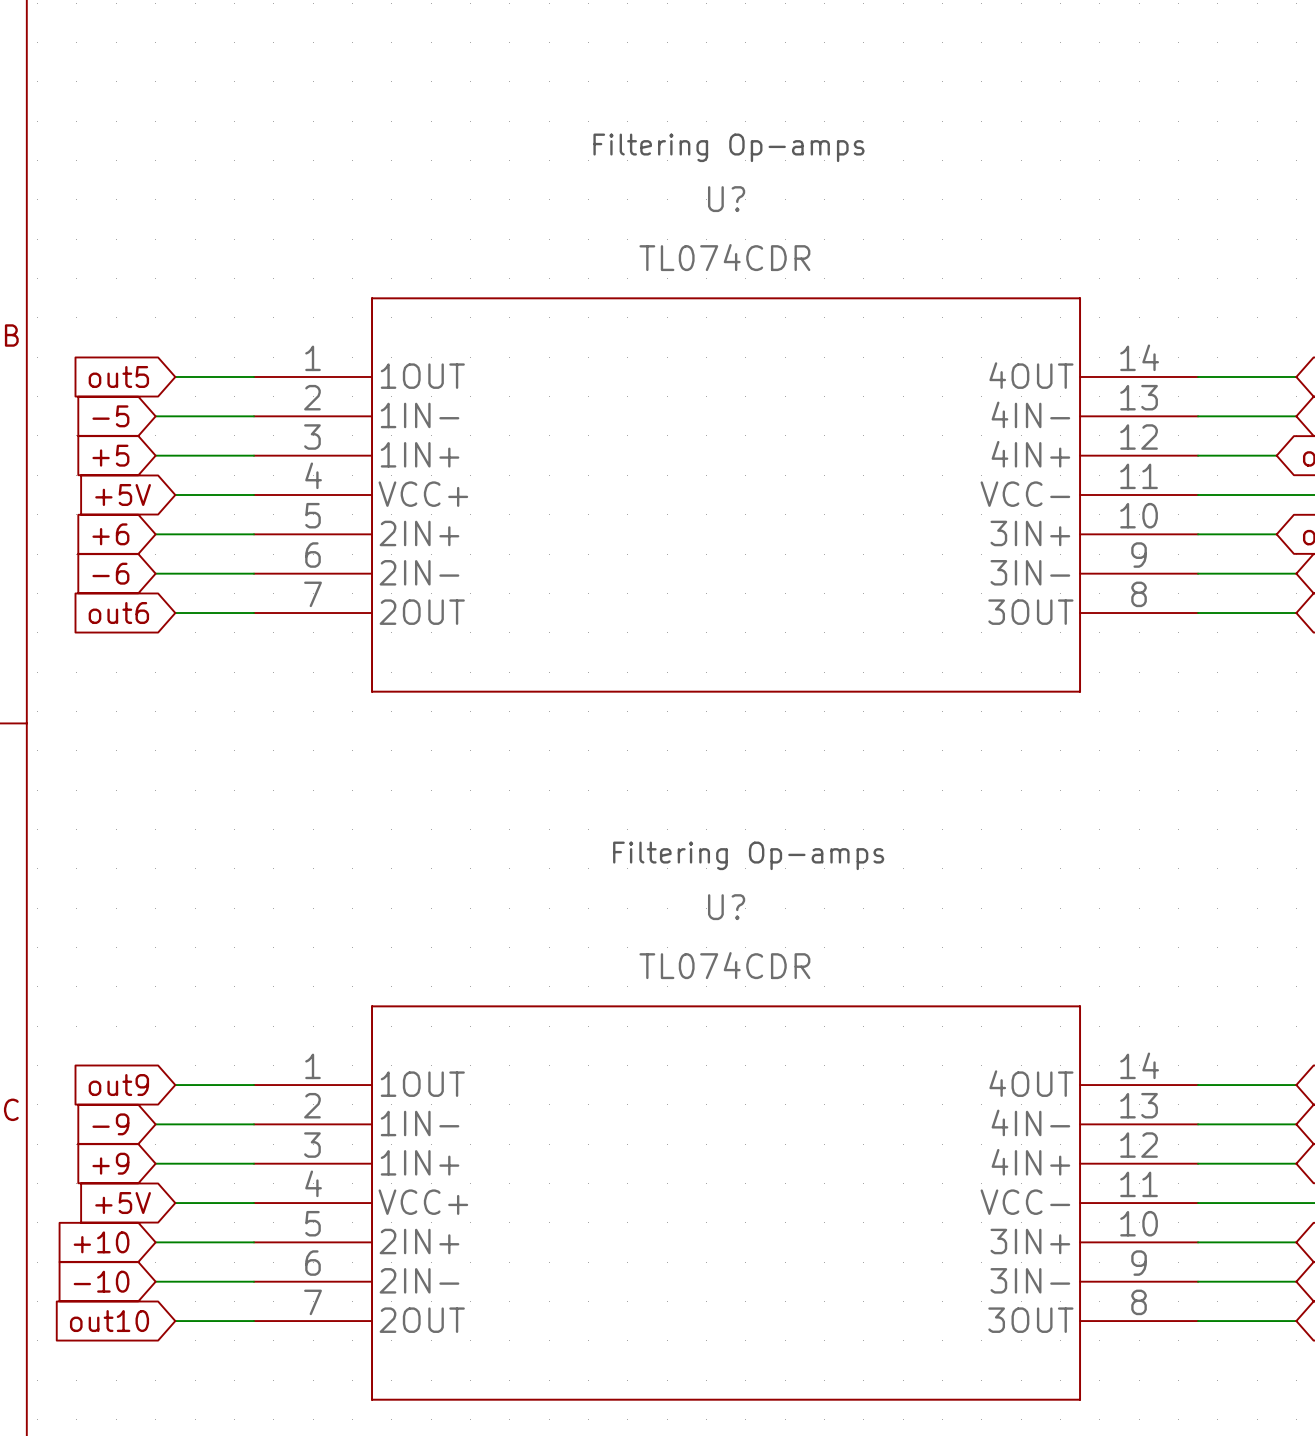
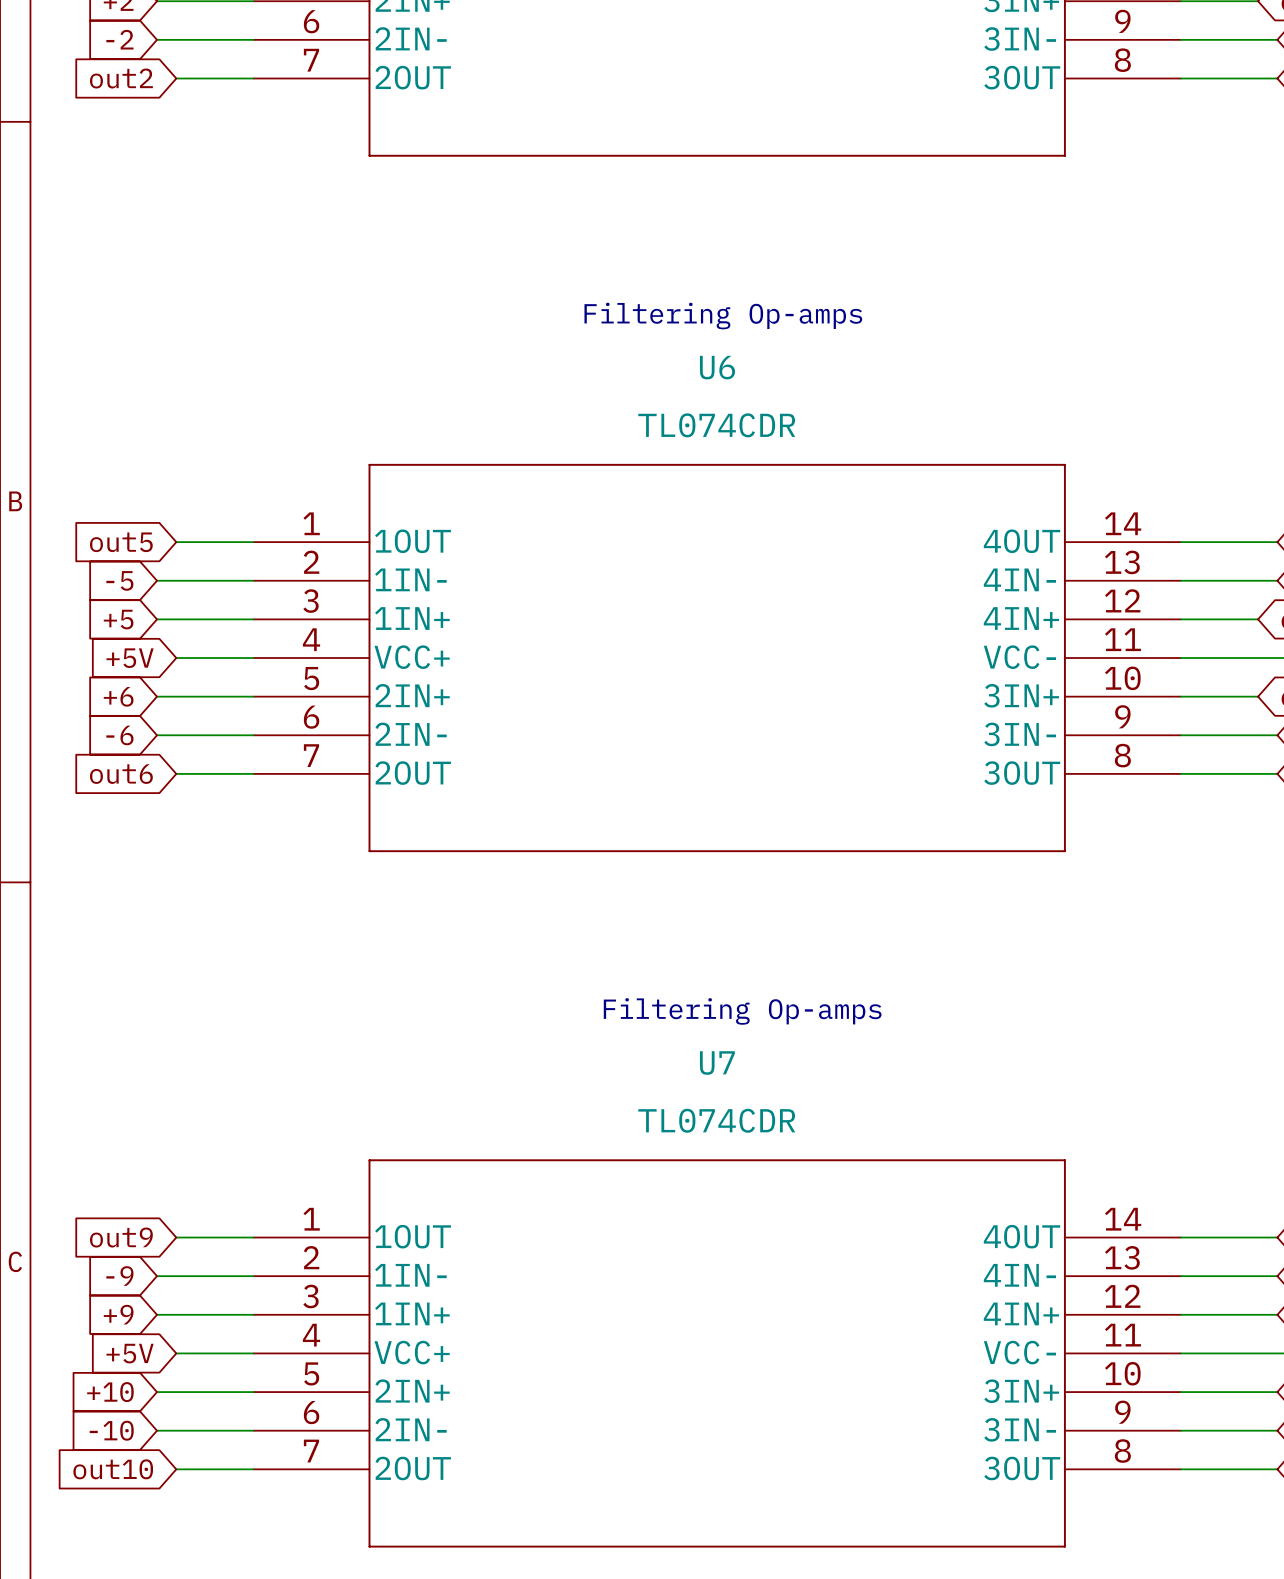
U? name: U? (726, 199) -> U6 (717, 367)
U? name: U? (726, 907) -> U7 (717, 1063)

